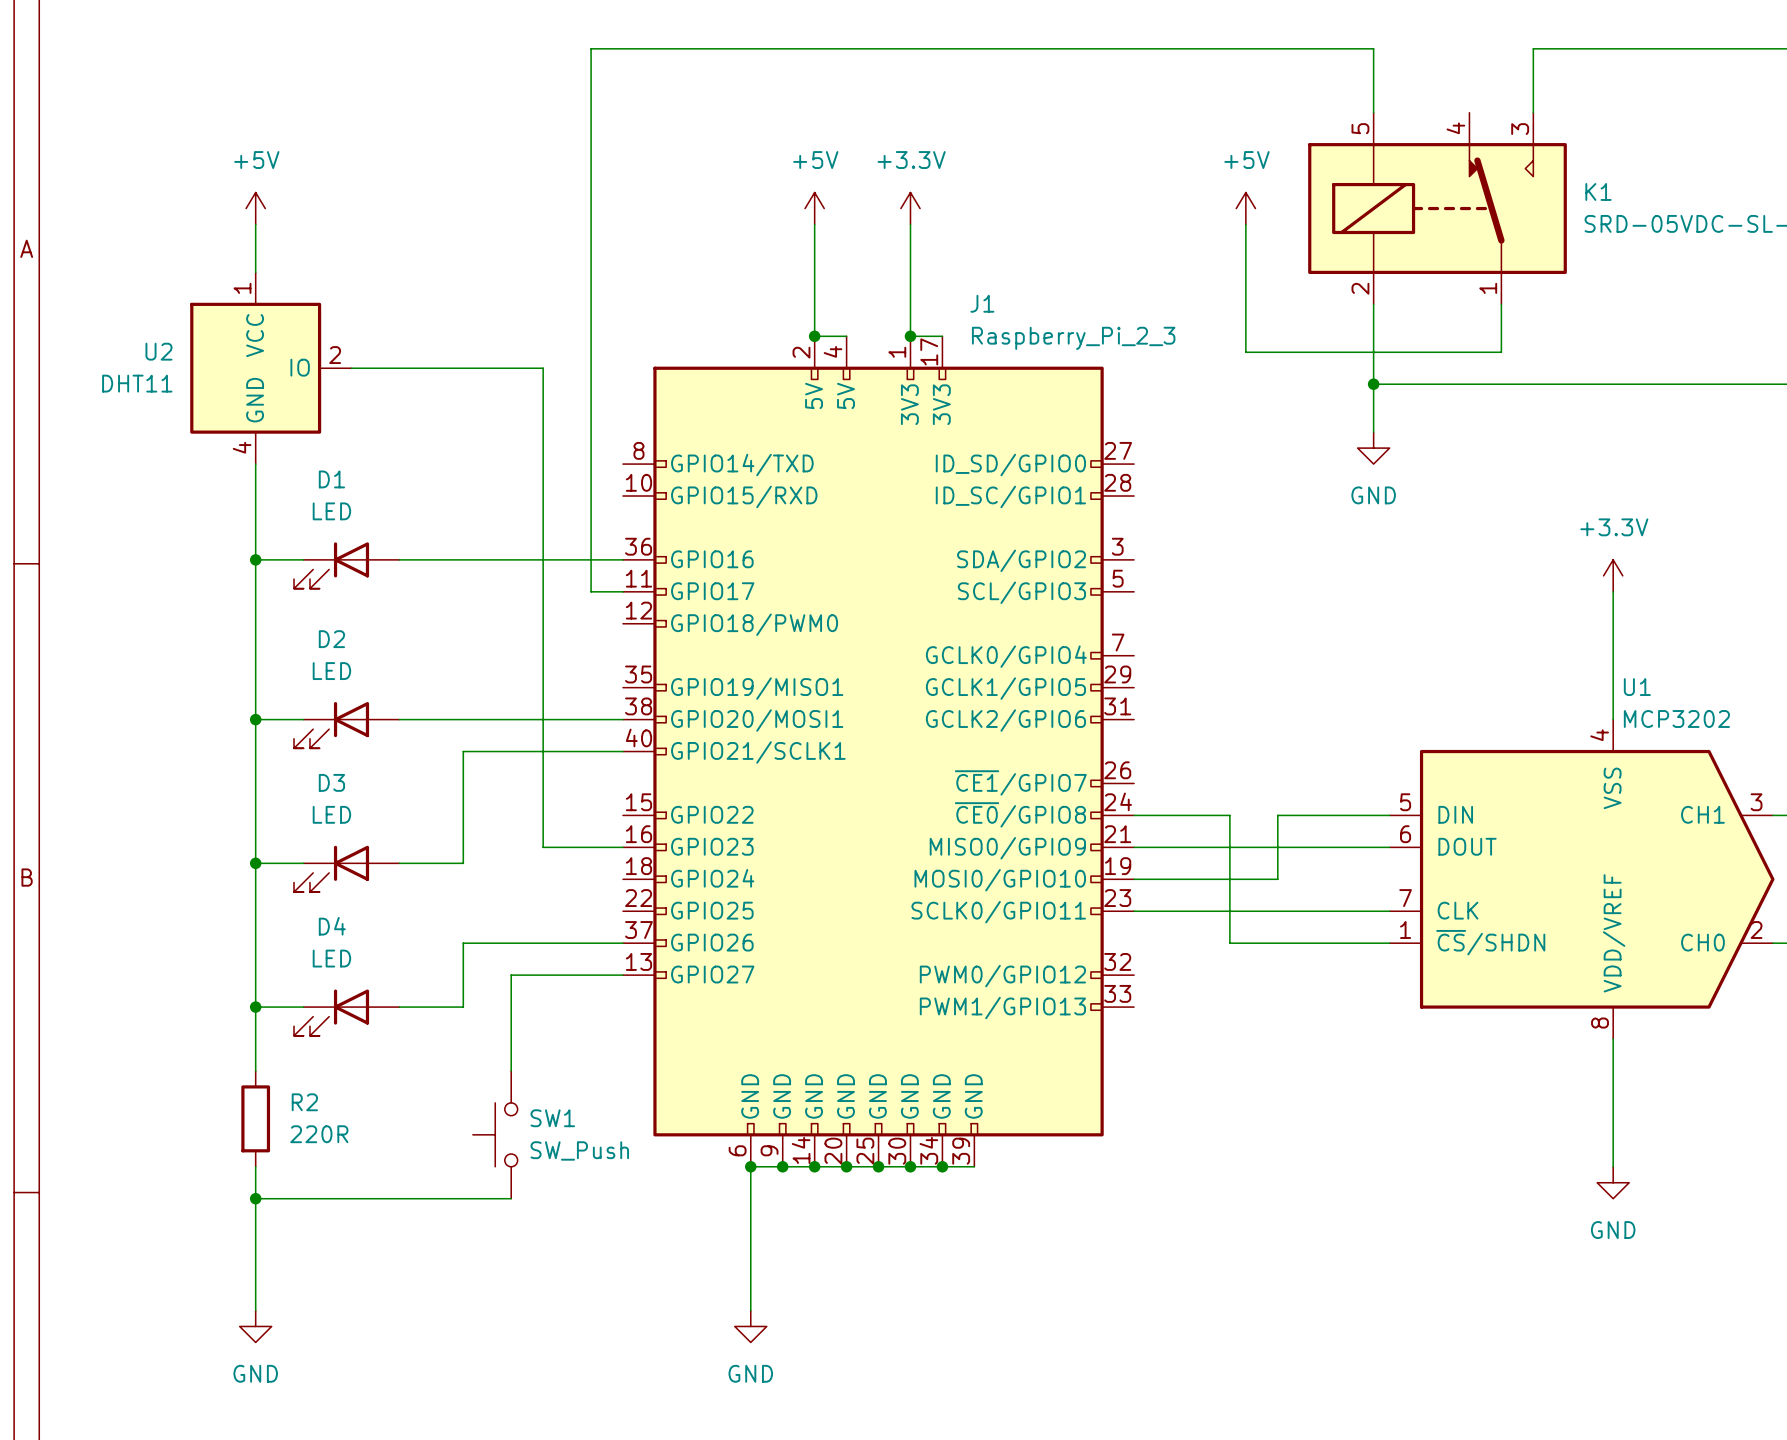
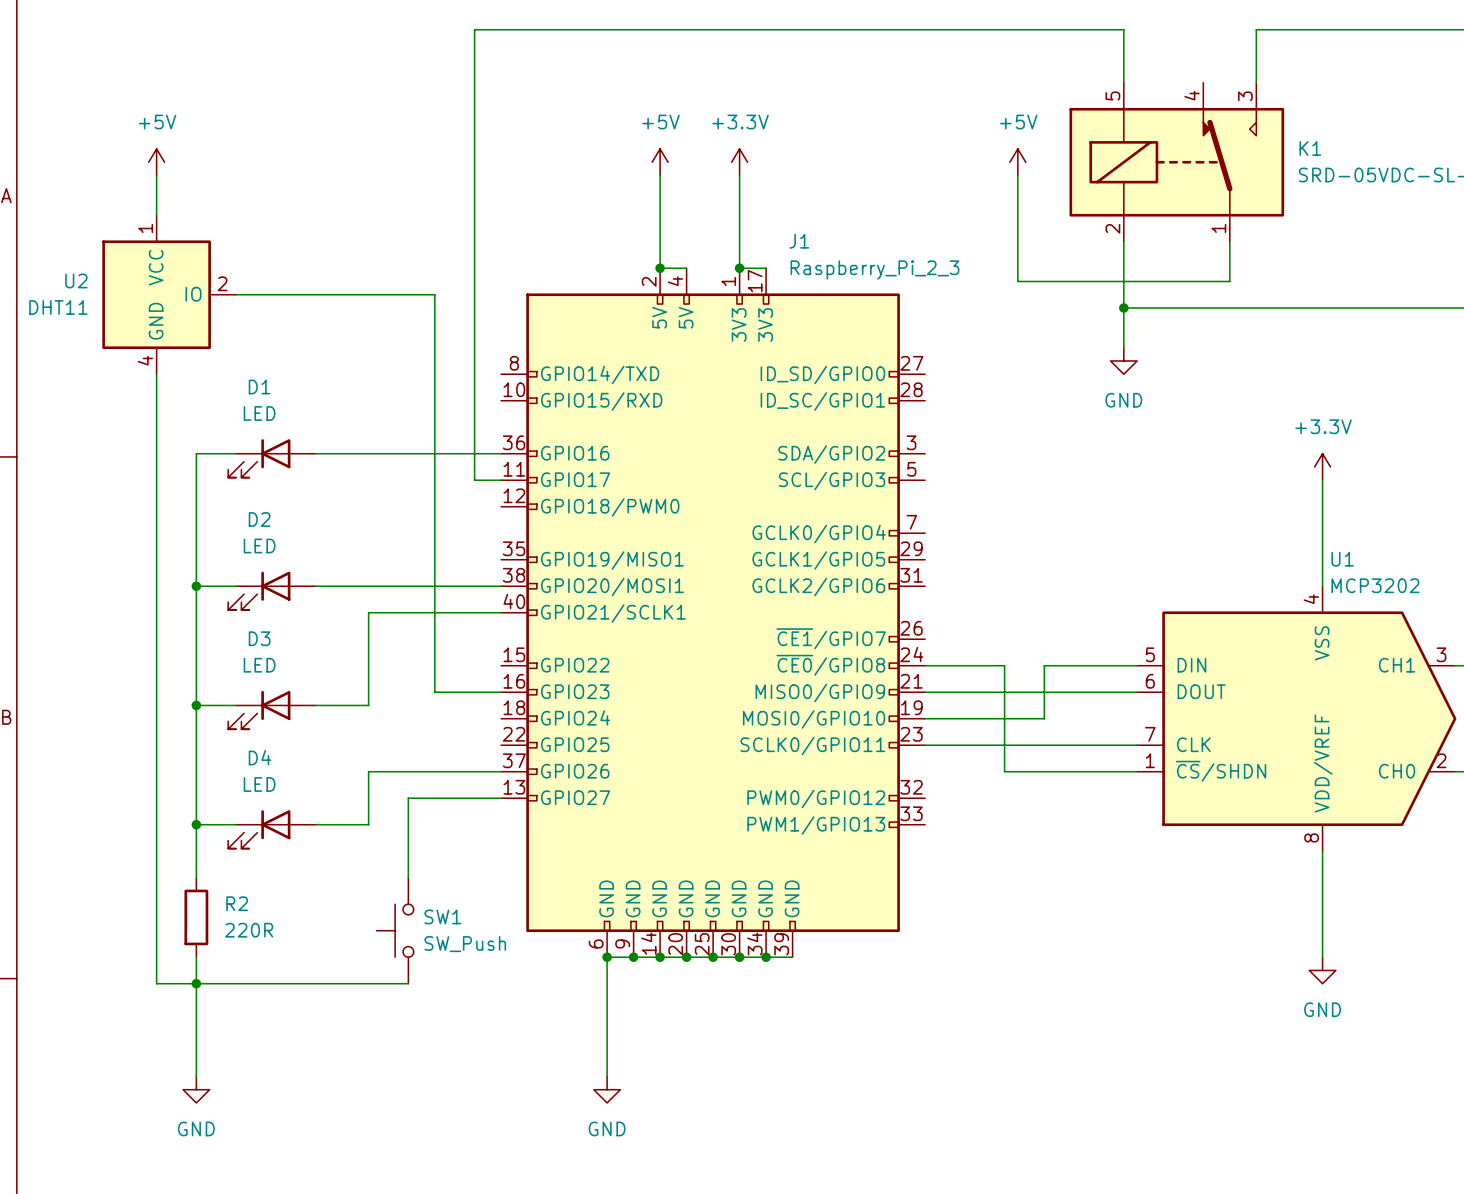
power symbol position: +5V (255, 208) -> +5V (156, 162)
wire: (255, 224) (255, 272) -> (156, 175) (156, 215)
U2 position: (270, 368) -> (169, 294)
wire: none -> (156, 374) (156, 983) (196, 983)
wire: (255, 464) (255, 559) -> none
junction: (255, 559) -> none

